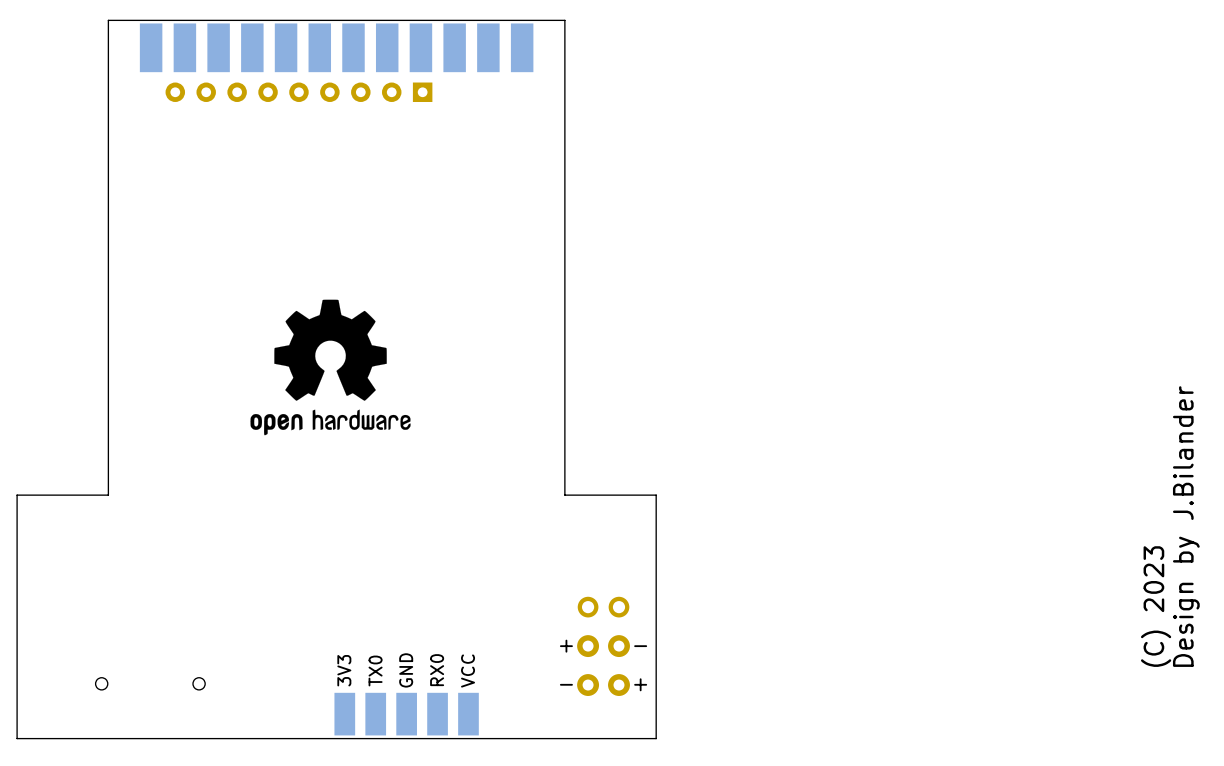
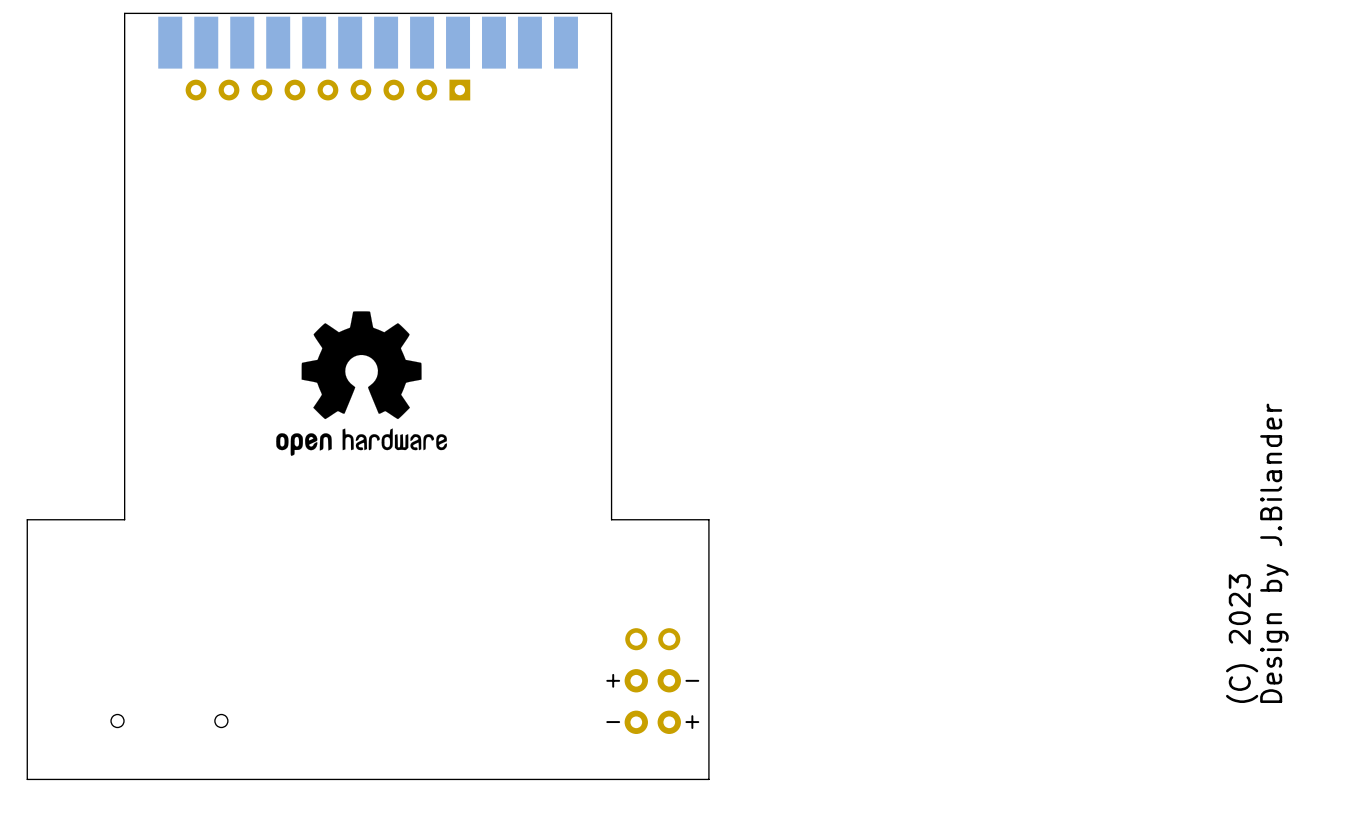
part: (406, 714) -> none

